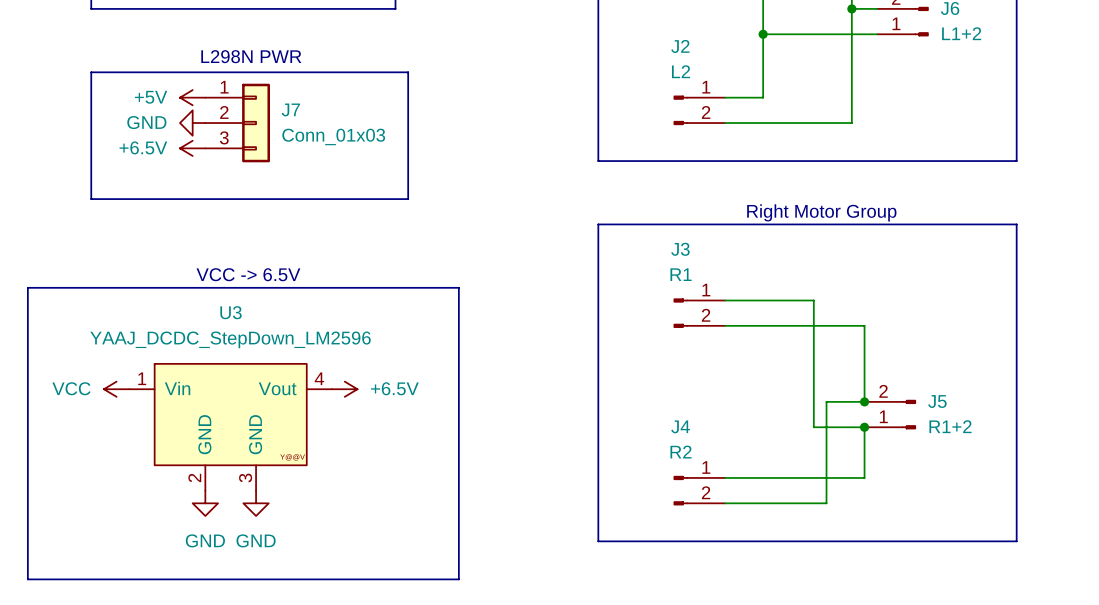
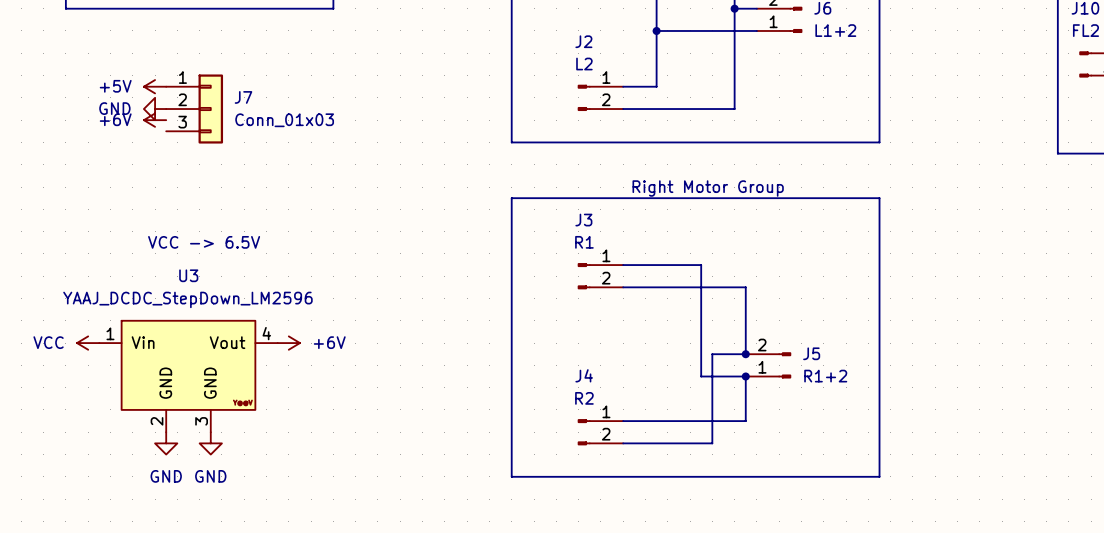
text: L298N PWR (251, 56) -> none
line: (91, 72) (91, 199) (408, 199) (408, 72) (91, 72) -> none
power symbol: none -> +6V (155, 120)
power symbol: +6.5V (192, 148) -> none
line: (27, 287) (458, 287) (458, 579) (27, 579) (27, 287) -> none
power symbol: +6.5V (344, 389) -> +6V (288, 343)

